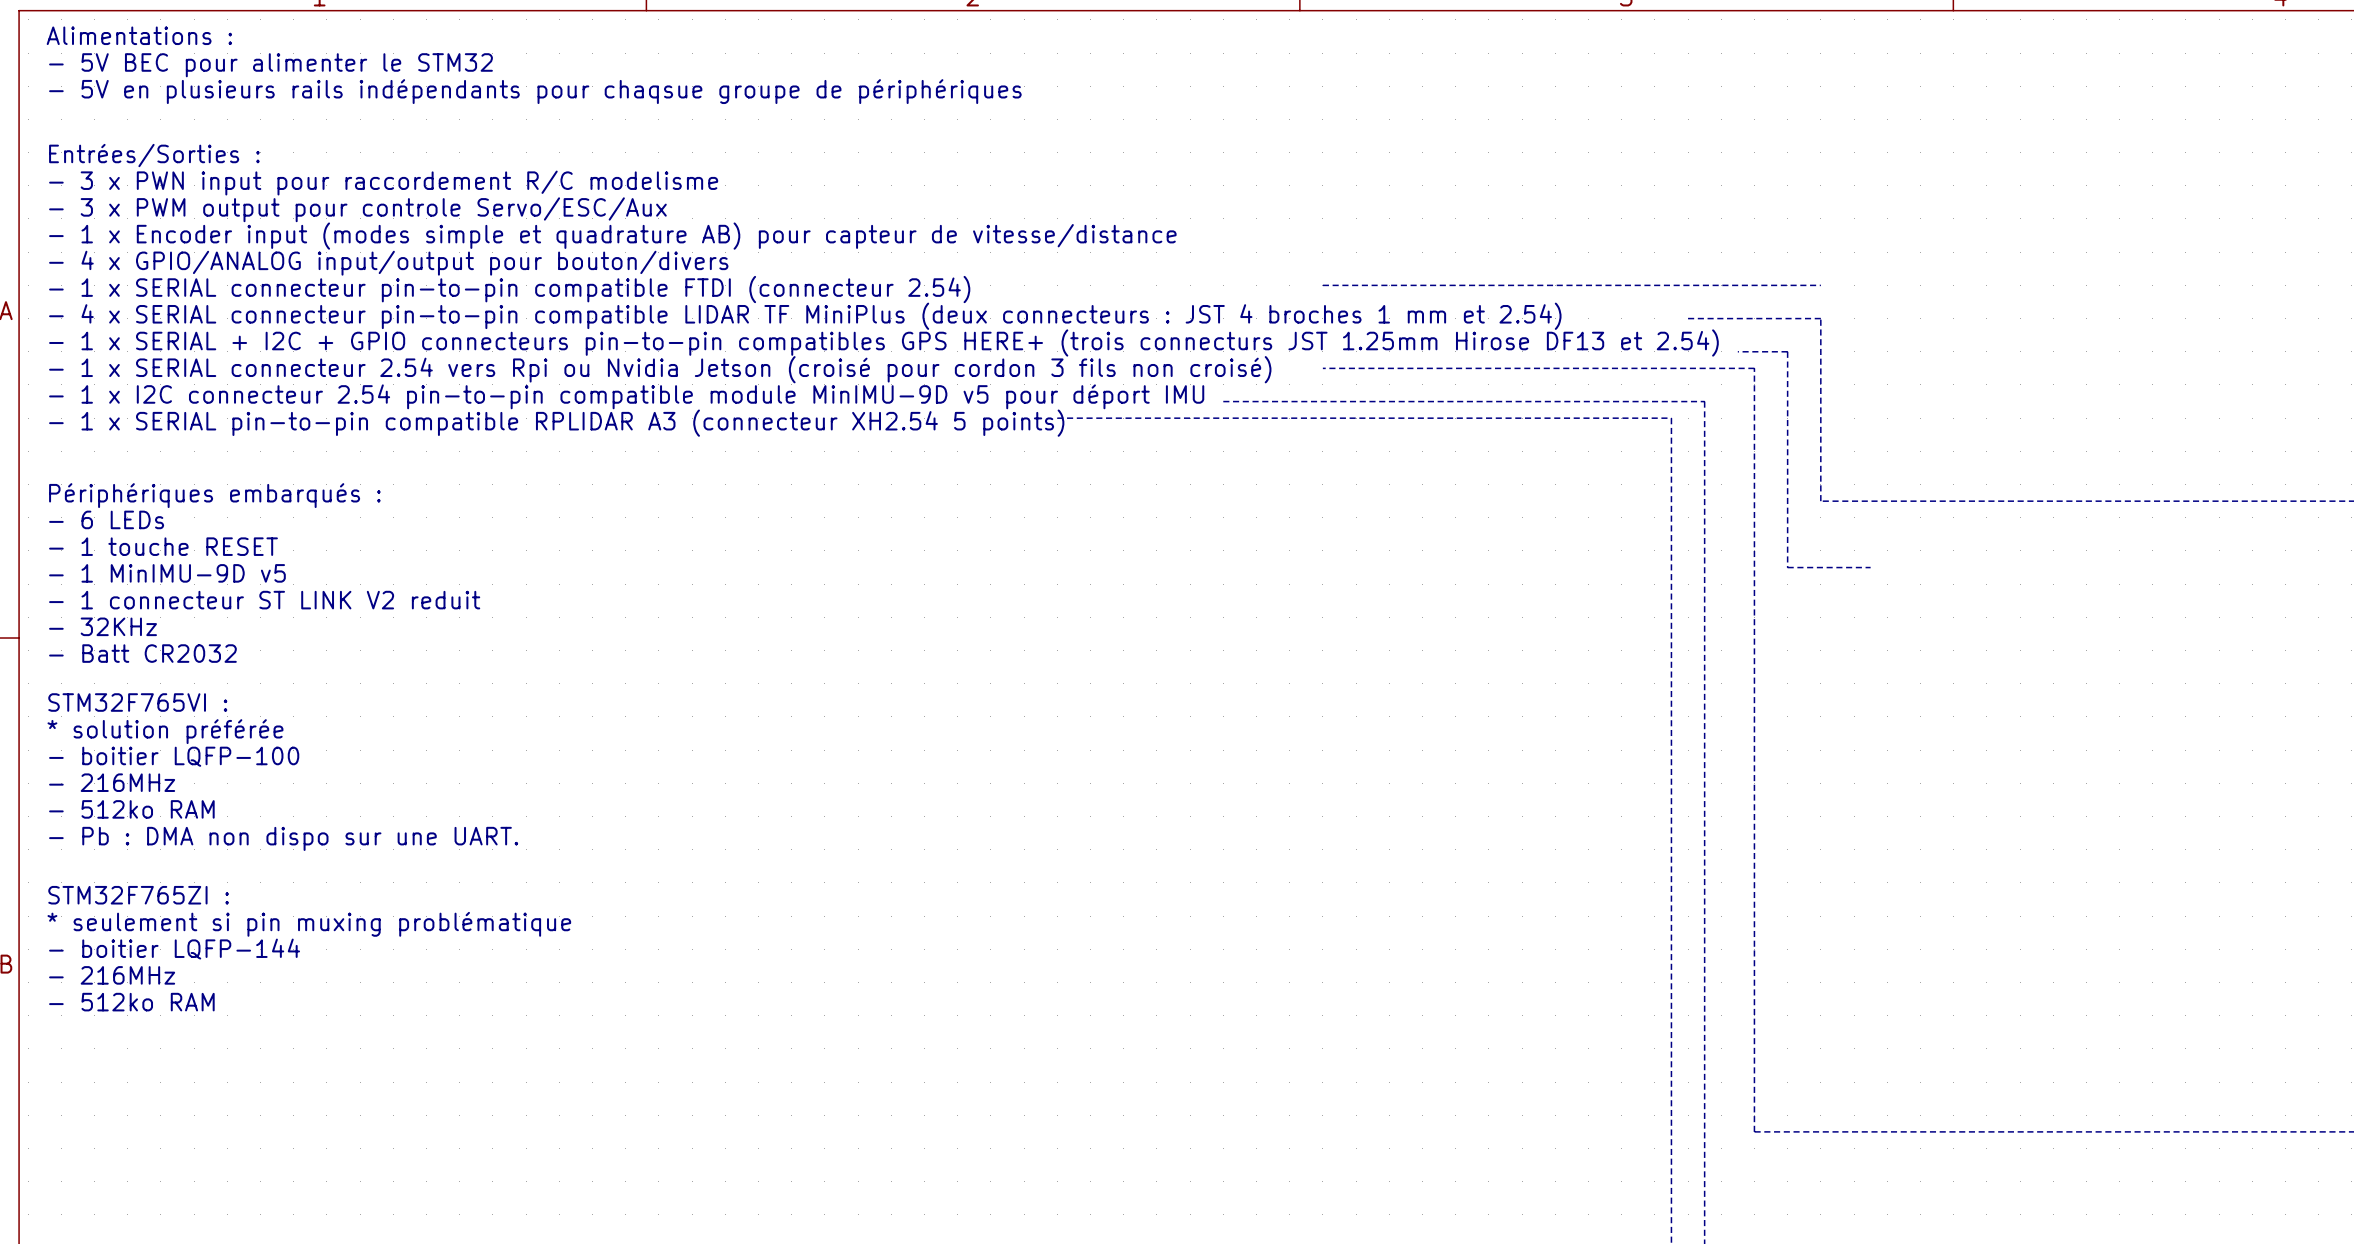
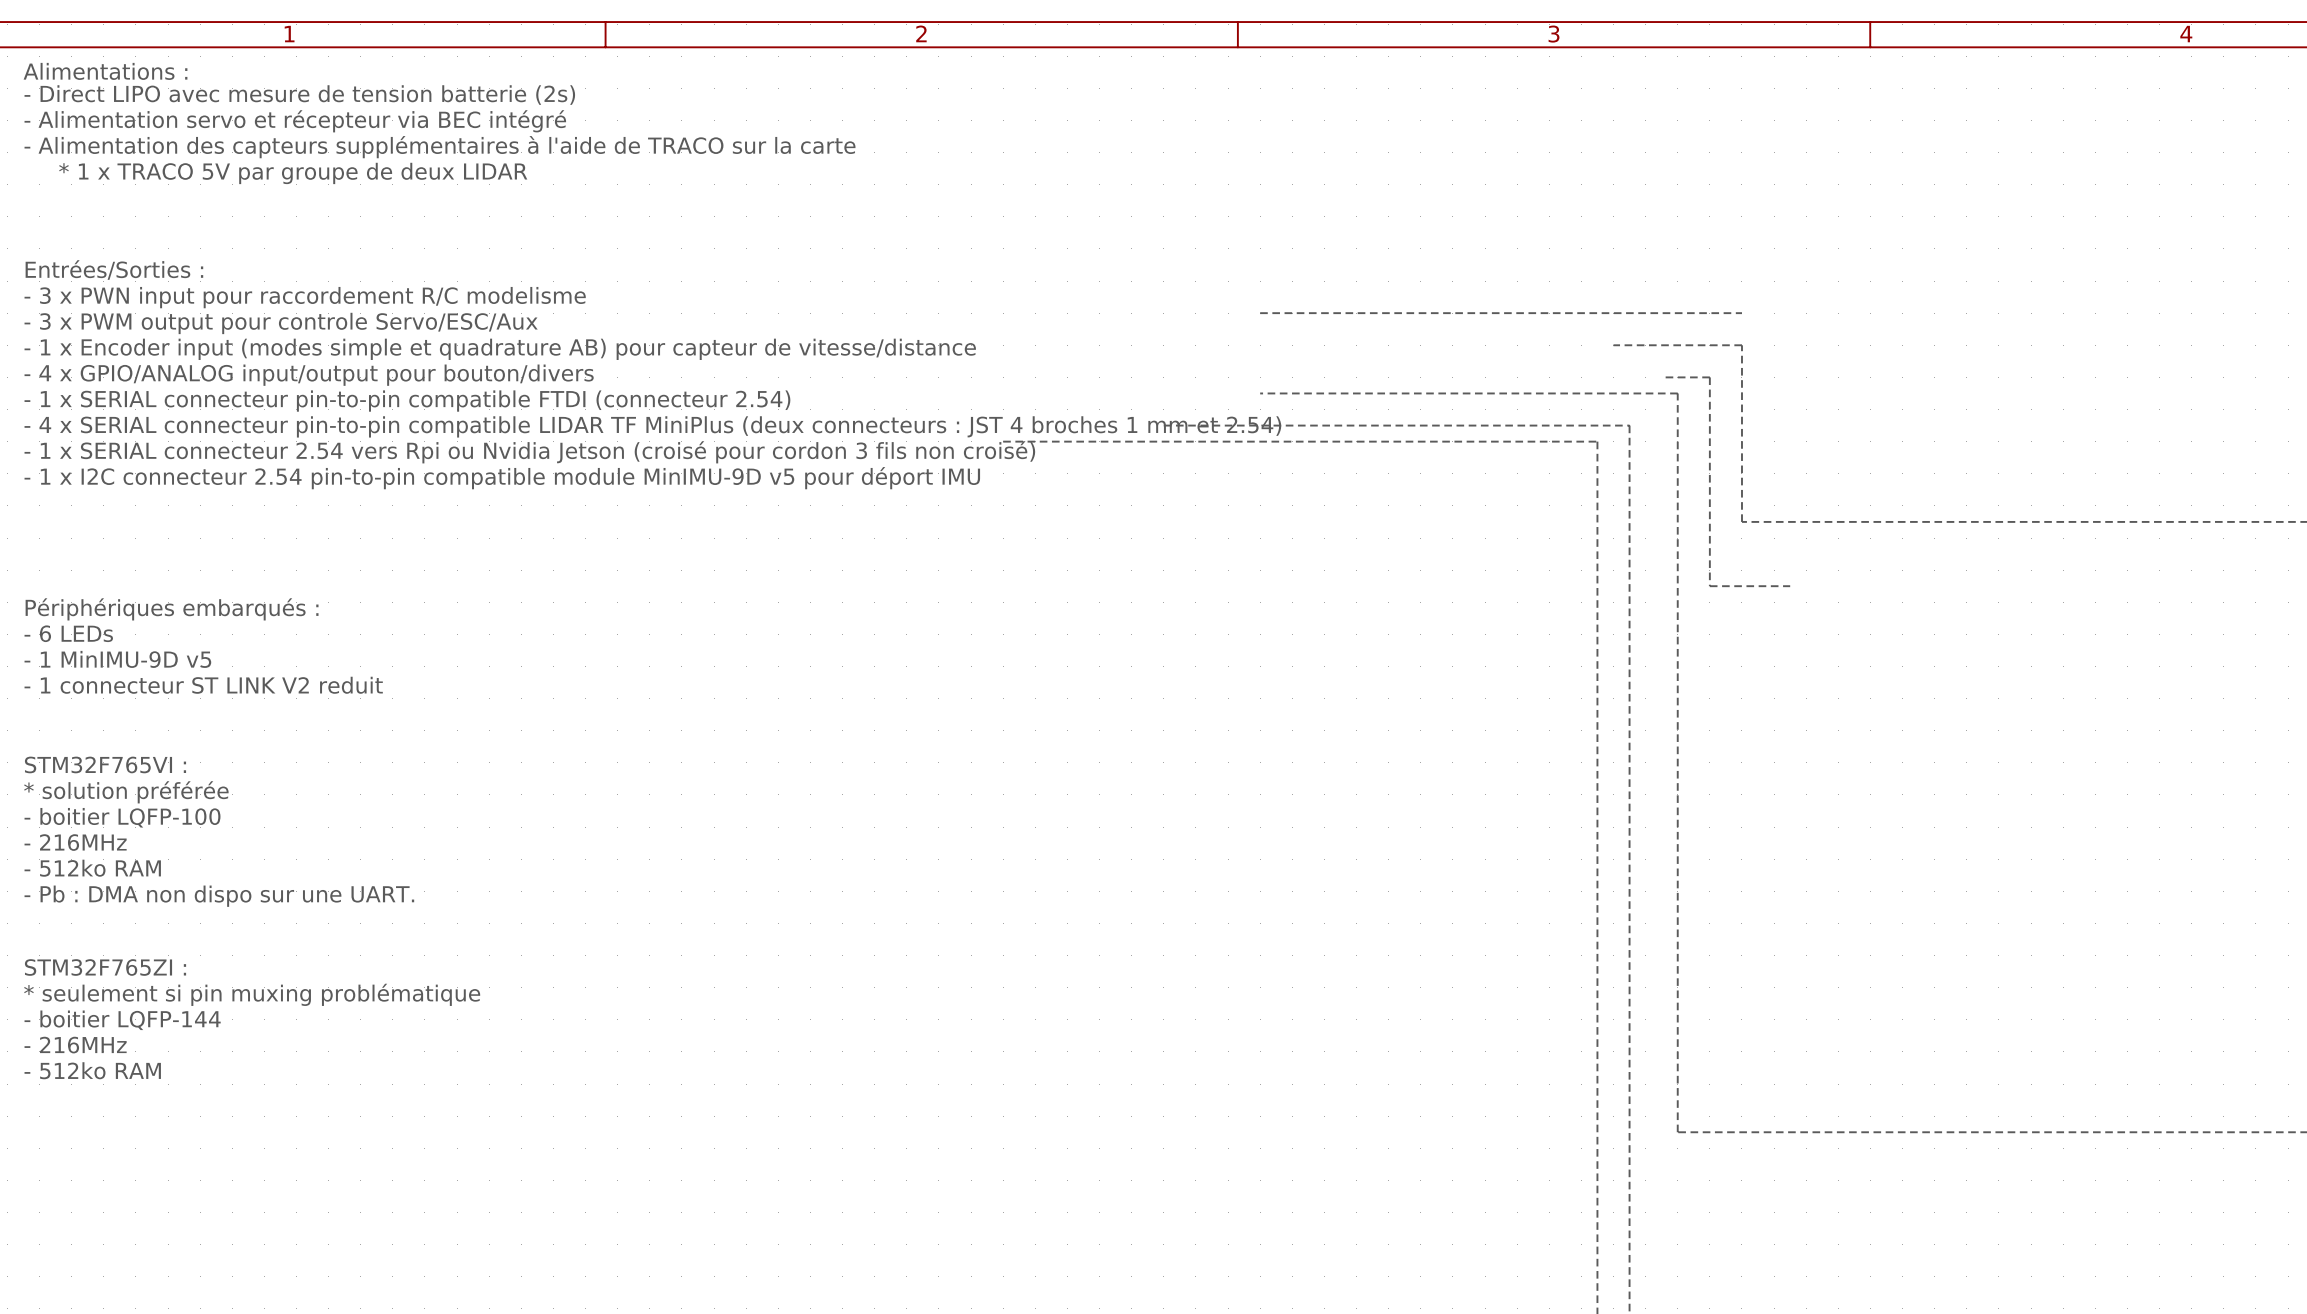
text: - 5V BEC pour alimenter le STM32 (270, 65) -> - Direct LIPO avec mesure de tension batterie (2s) (299, 95)
text: - 5V en plusieurs rails indépendants pour chaqsue groupe de périphériques (535, 91) -> - Alimentation servo et récepteur via BEC intégré (295, 121)
text: none -> - Alimentation des capteurs supplémentaires à l'aide de TRACO sur la carte (440, 147)
text: none -> * 1 x TRACO 5V par groupe de deux LIDAR (293, 173)
text position: Entrées/Sorties : (154, 155) -> Entrées/Sorties : (114, 270)
text position: - 3 x PWN input pour raccordement R/C modelisme (383, 183) -> - 3 x PWN input pour raccordement R/C modelisme (305, 297)
text position: - 3 x PWM output pour controle Servo/ESC/Aux (357, 209) -> - 3 x PWM output pour controle Servo/ESC/Aux (281, 323)
text position: - 1 x Encoder input (modes simple et quadrature AB) pour capteur de vitesse/distance (612, 236) -> - 1 x Encoder input (modes simple et quadrature AB) pour capteur de vitesse/distance (500, 349)
text position: - 4 x GPIO/ANALOG input/output pour bouton/divers (388, 263) -> - 4 x GPIO/ANALOG input/output pour bouton/divers (309, 375)
text position: - 1 x SERIAL connecteur pin-to-pin compatible FTDI (connecteur 2.54) (509, 289) -> - 1 x SERIAL connecteur pin-to-pin compatible FTDI (connecteur 2.54) (407, 401)
text position: - 4 x SERIAL connecteur pin-to-pin compatible LIDAR TF MiniPlus (deux connecteurs : JST 4 broches 1 mm et 2.54) (805, 316) -> - 4 x SERIAL connecteur pin-to-pin compatible LIDAR TF MiniPlus (deux connecteurs : JST 4 broches 1 mm et 2.54) (652, 426)
text: - 1 x SERIAL + I2C + GPIO connecteurs pin-to-pin compatibles GPS HERE+ (trois connecturs JST 1.25mm Hirose DF13 et 2.54) (883, 342) -> none
text position: - 1 x SERIAL connecteur 2.54 vers Rpi ou Nvidia Jetson (croisé pour cordon 3 fils non croisé) (660, 369) -> - 1 x SERIAL connecteur 2.54 vers Rpi ou Nvidia Jetson (croisé pour cordon 3 fils non croisé) (529, 452)
text position: - 1 x I2C connecteur 2.54 pin-to-pin compatible module MinIMU-9D v5 pour déport IMU (626, 396) -> - 1 x I2C connecteur 2.54 pin-to-pin compatible module MinIMU-9D v5 pour déport IMU (502, 478)
text: - 1 x SERIAL pin-to-pin compatible RPLIDAR A3 (connecteur XH2.54 5 points) (556, 423) -> none
text position: Périphériques embarqués : (214, 495) -> Périphériques embarqués : (172, 609)
text position: - 6 LEDs (106, 519) -> - 6 LEDs (68, 633)
text: - 1 touche RESET (163, 546) -> none
text position: - 1 MinIMU-9D v5 (167, 573) -> - 1 MinIMU-9D v5 (117, 659)
text position: - 1 connecteur ST LINK V2 reduit (264, 600) -> - 1 connecteur ST LINK V2 reduit (203, 685)
text: - 32KHz (103, 626) -> none
text: - Batt CR2032 (142, 653) -> none
text position: STM32F765VI : (137, 702) -> STM32F765VI : (105, 764)
text position: * solution préférée (165, 731) -> * solution préférée (126, 792)
text position: - boitier LQFP-100 (174, 756) -> - boitier LQFP-100 (122, 817)
text position: - 216MHz (112, 782) -> - 216MHz (75, 842)
text position: - 512ko RAM (131, 809) -> - 512ko RAM (92, 868)
text position: - Pb : DMA non dispo sur une UART. (283, 838) -> - Pb : DMA non dispo sur une UART. (219, 896)
text position: STM32F765ZI : (138, 895) -> STM32F765ZI : (105, 967)
text position: * seulement si pin muxing problématique (309, 924) -> * seulement si pin muxing problématique (252, 994)
text position: - boitier LQFP-144 (174, 949) -> - boitier LQFP-144 (122, 1020)
text position: - 216MHz (112, 975) -> - 216MHz (75, 1045)
text position: - 512ko RAM (131, 1002) -> - 512ko RAM (92, 1070)

